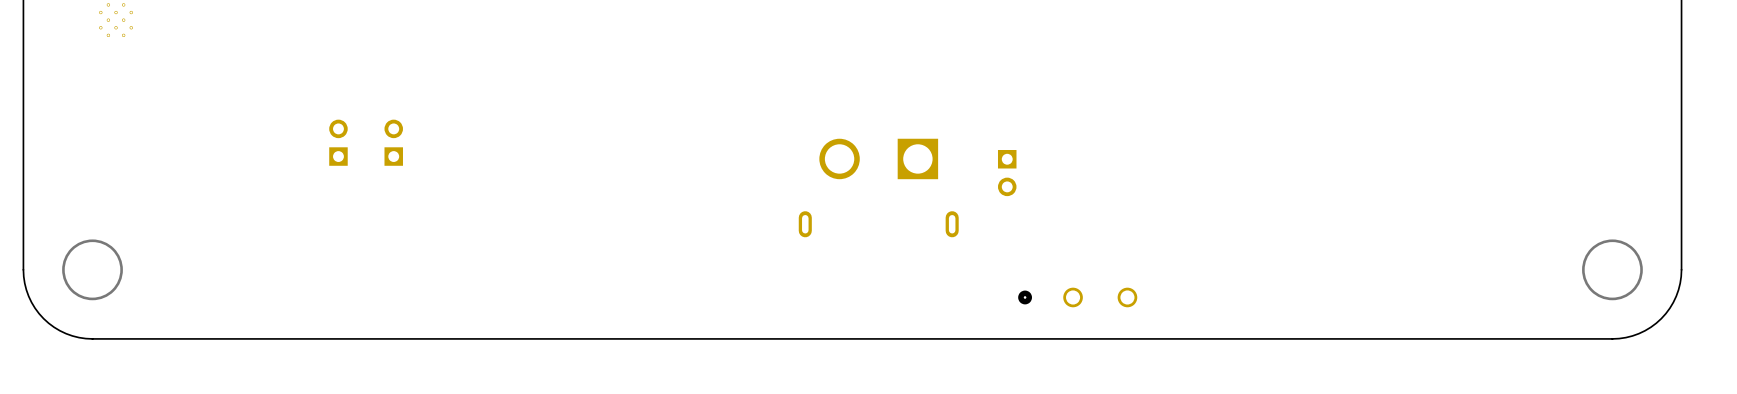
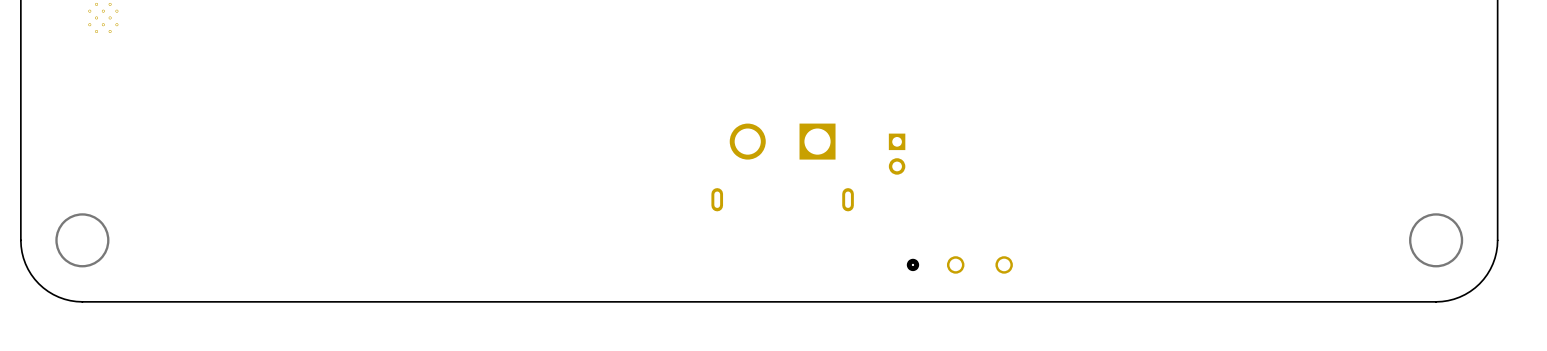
part: (338, 142) -> none
part: (393, 142) -> none

